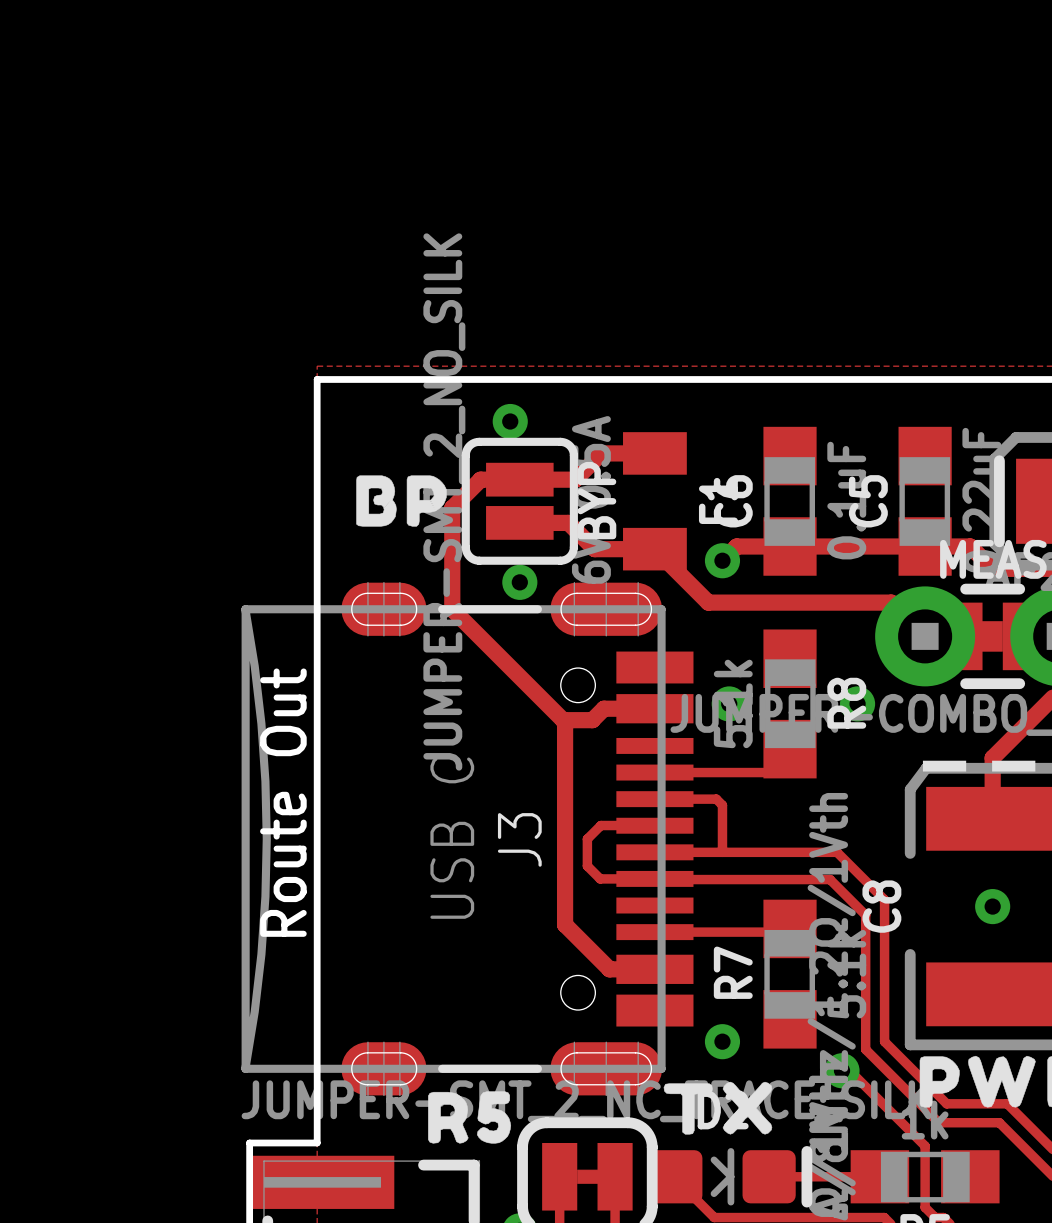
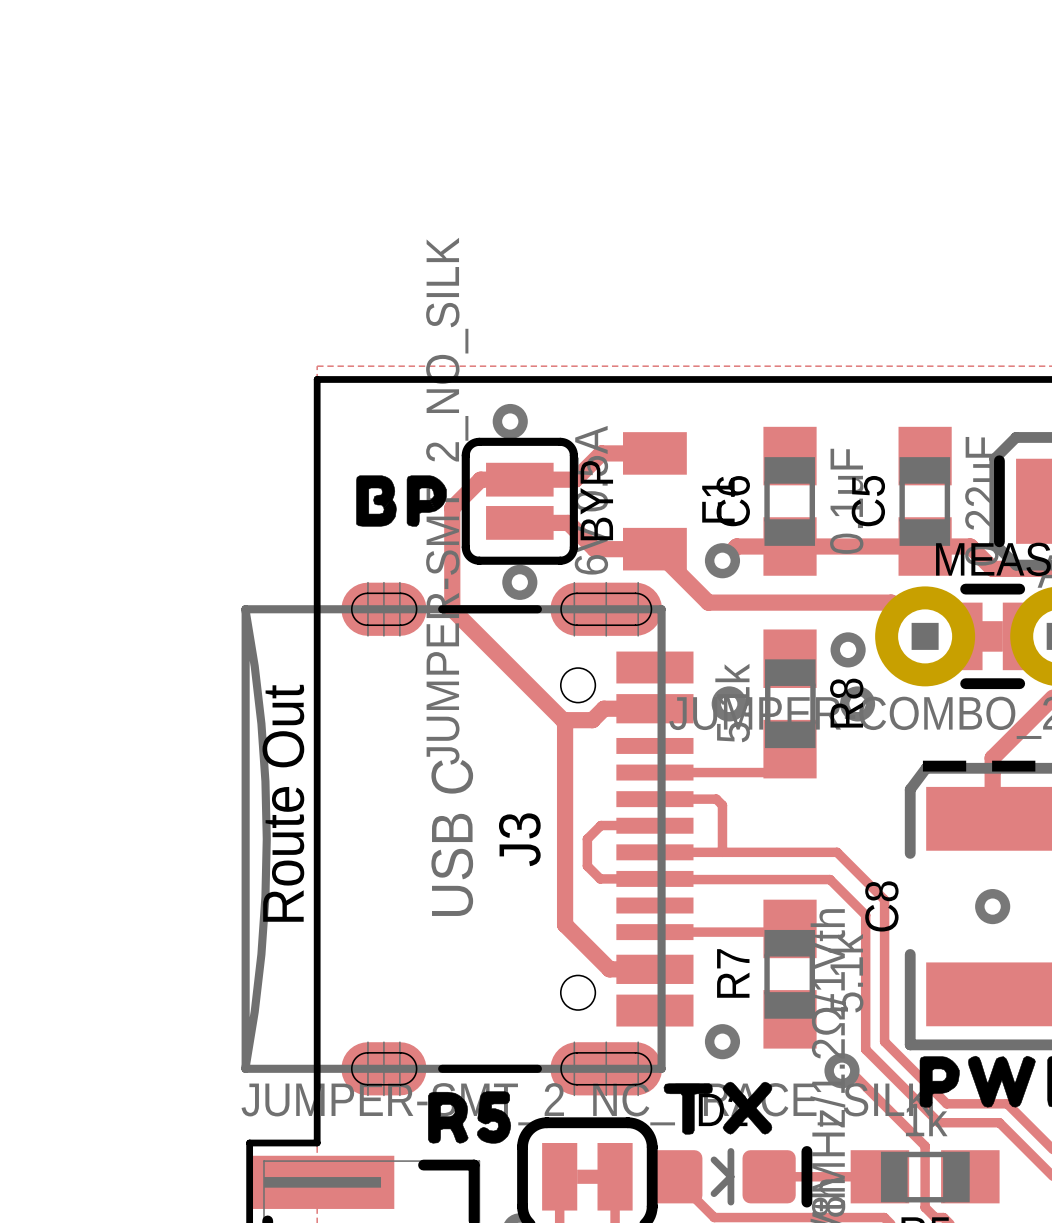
via: none -> (848, 649)

